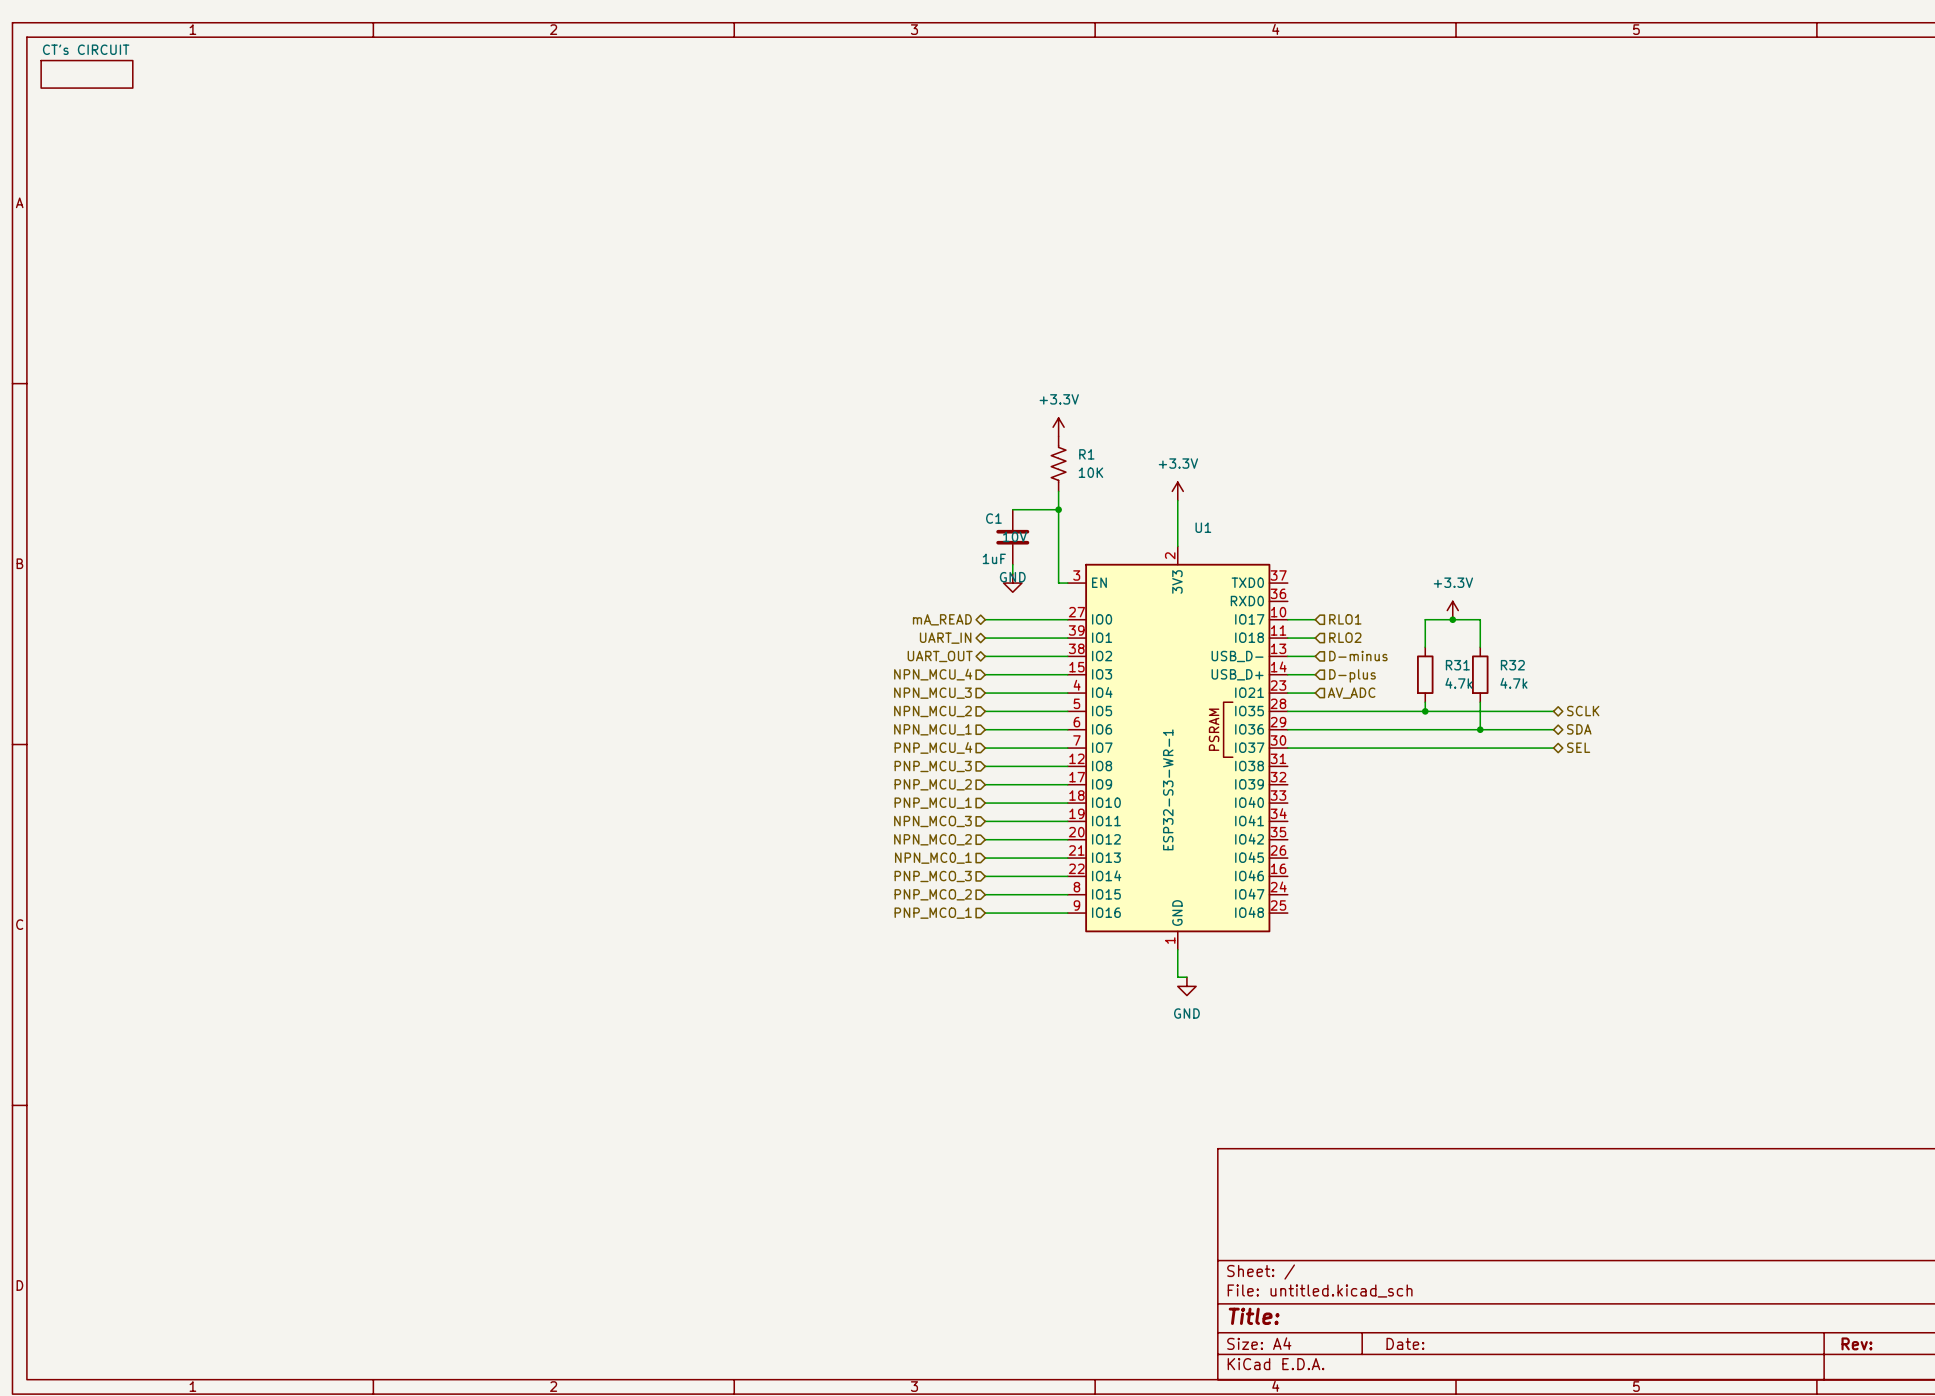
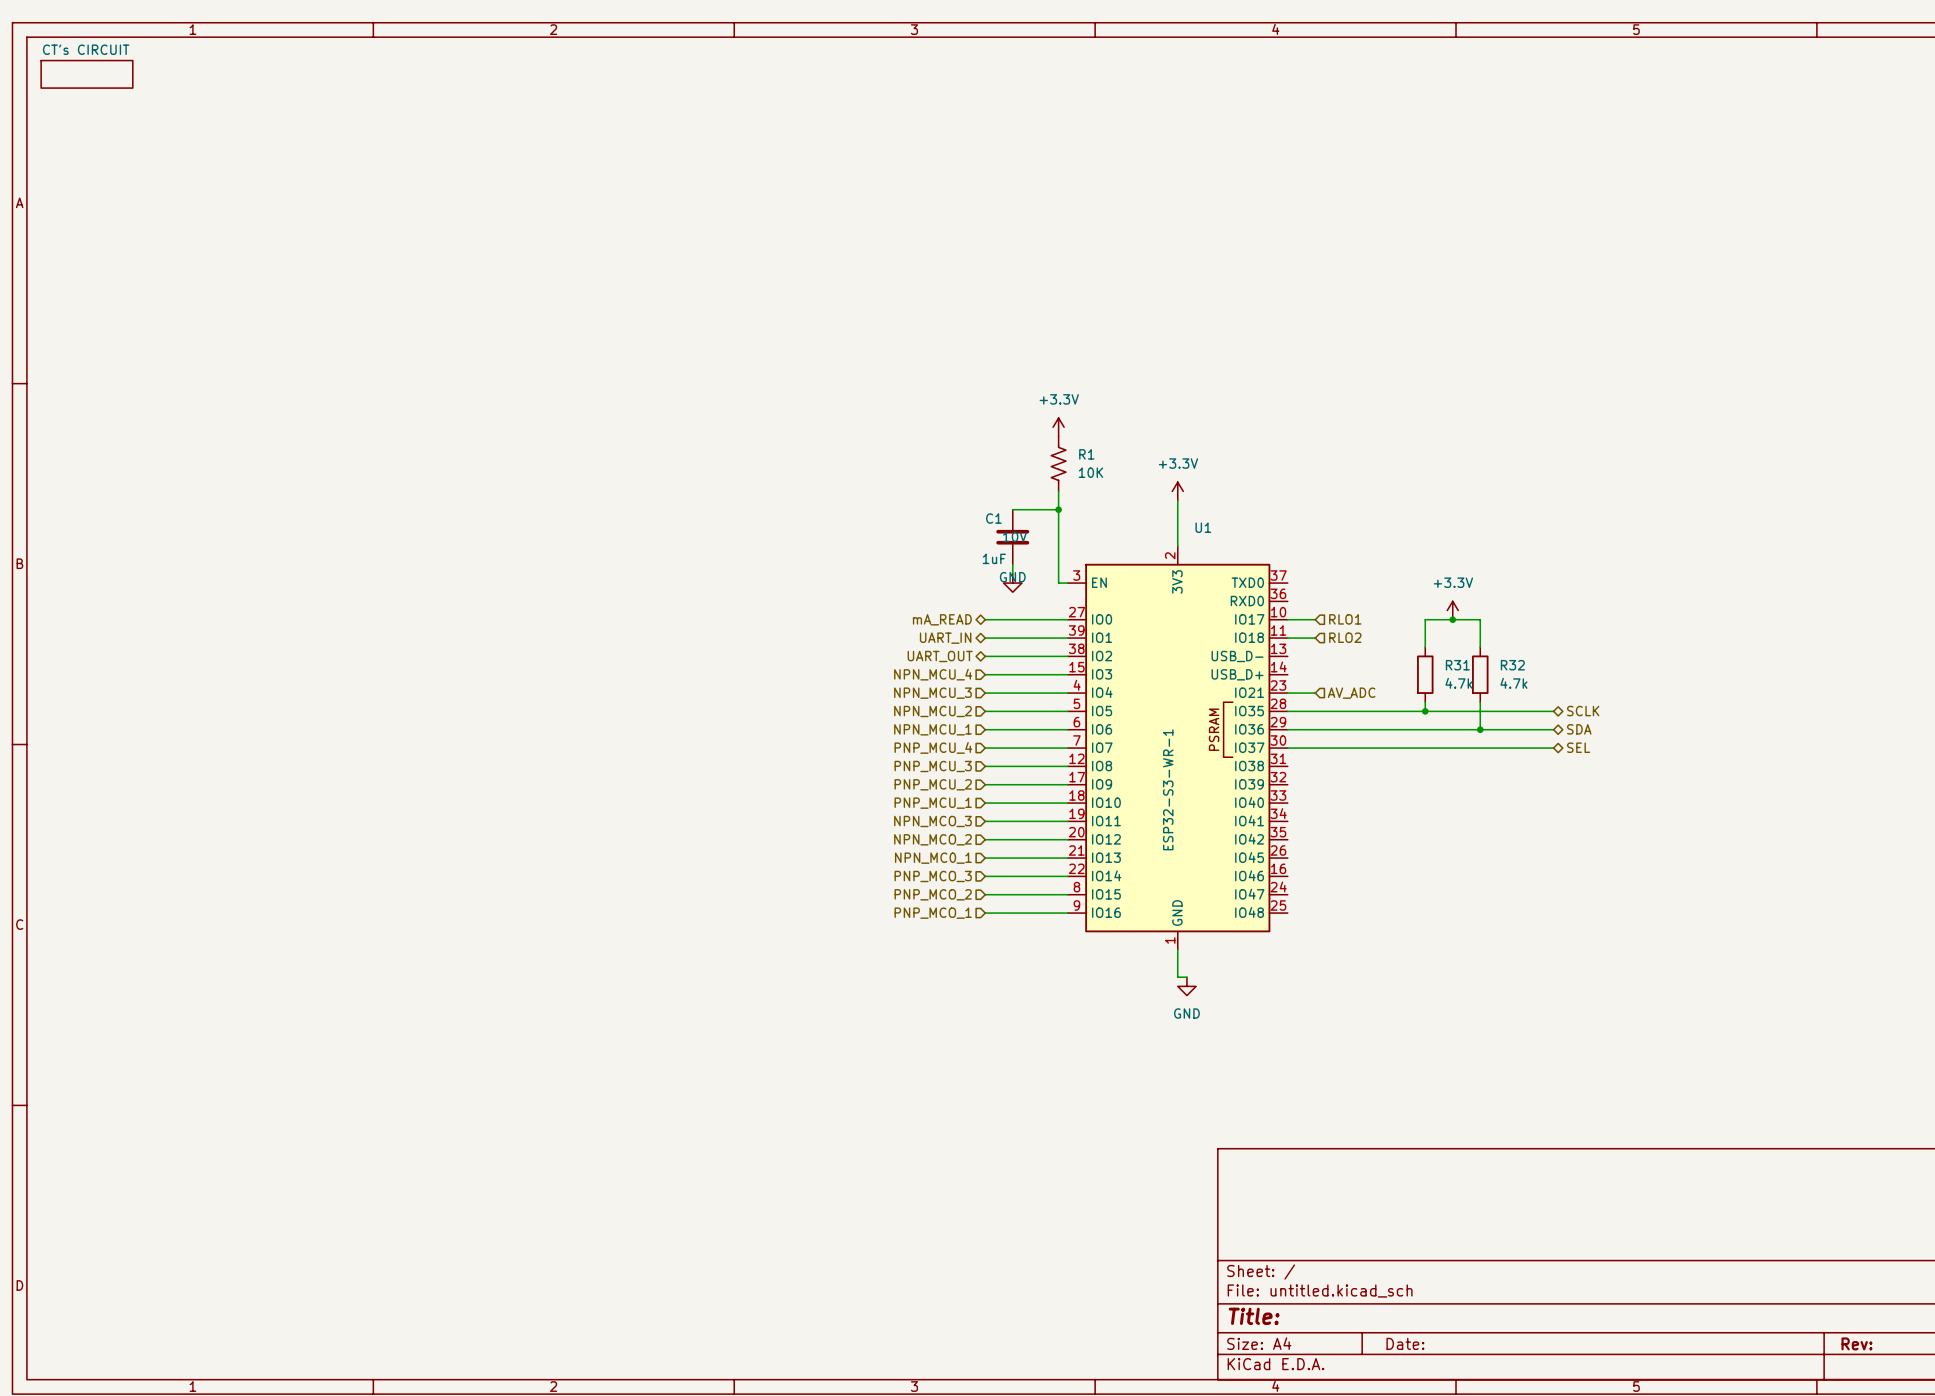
wire: (1287, 656) (1315, 656) -> none
hierarchical label: D-minus (1358, 656) -> none
wire: (1287, 674) (1315, 674) -> none
hierarchical label: D-plus (1352, 675) -> none

